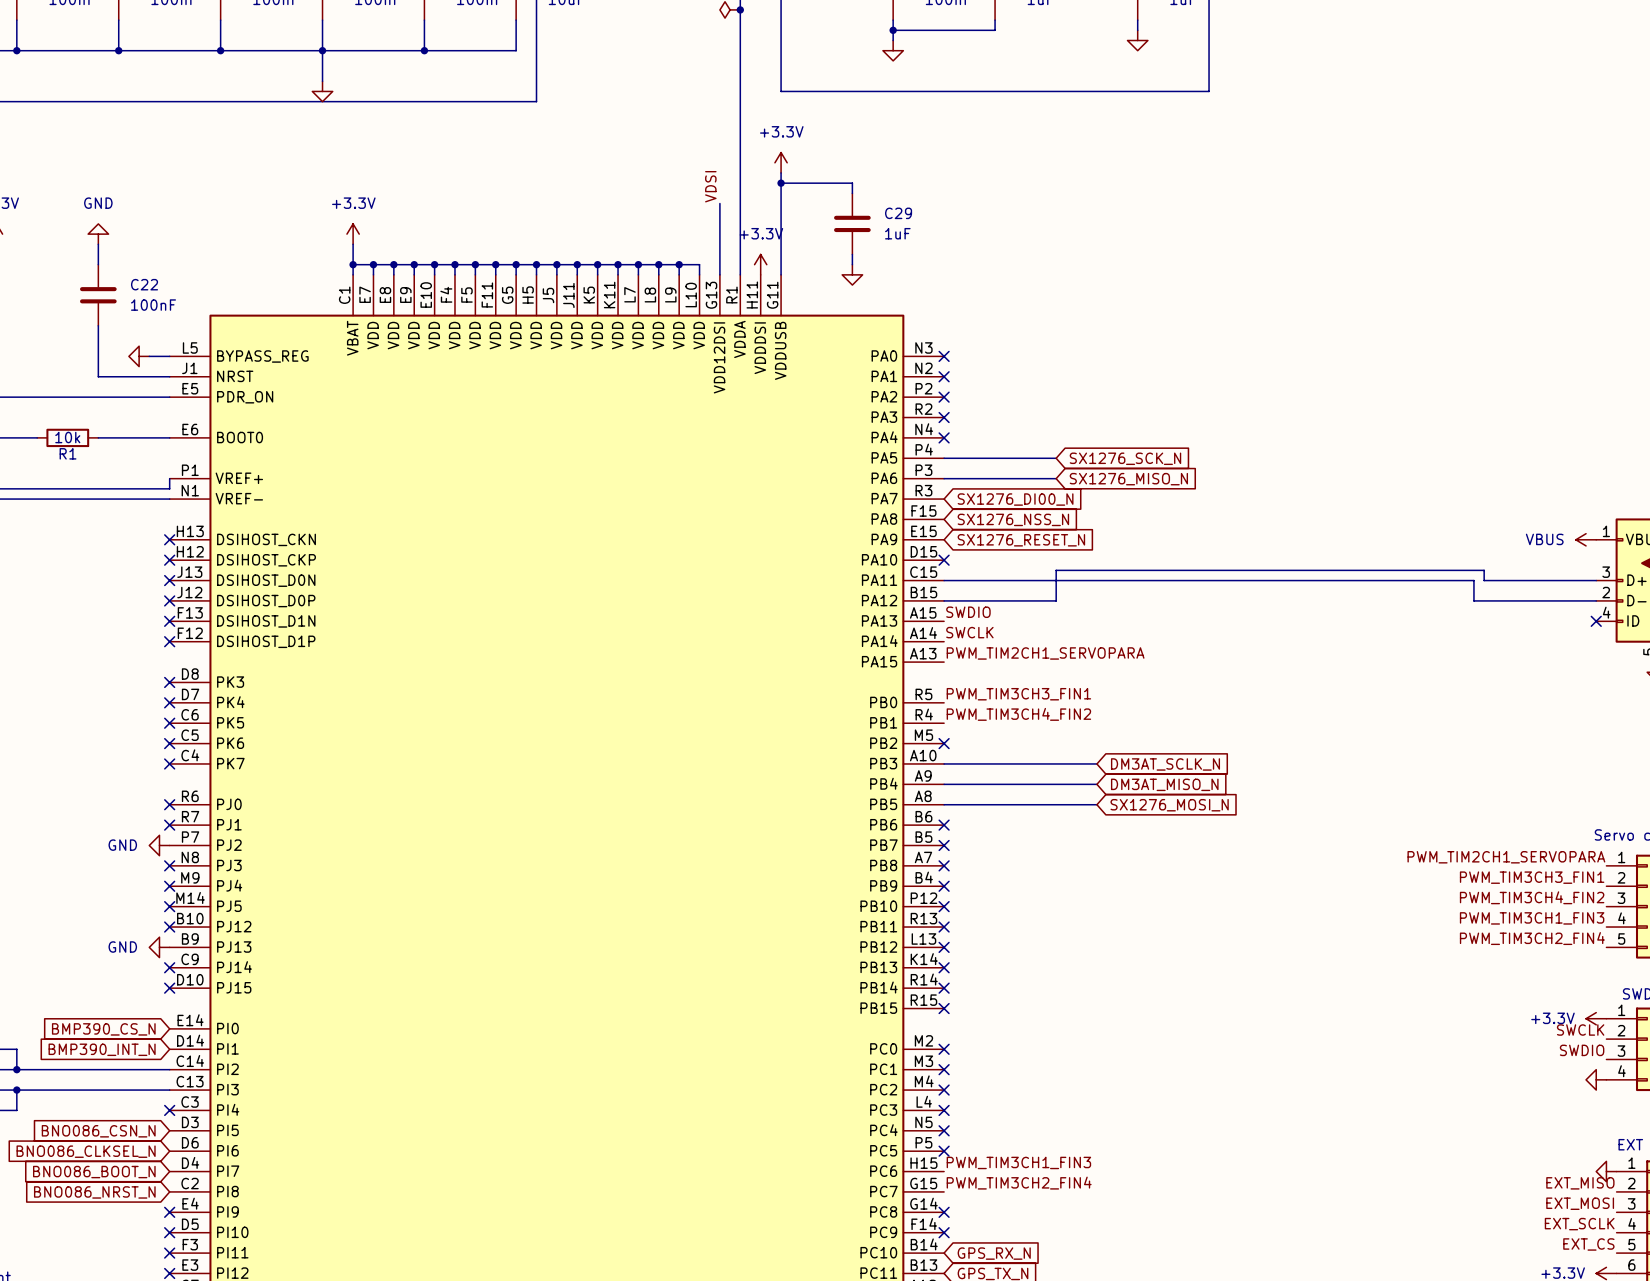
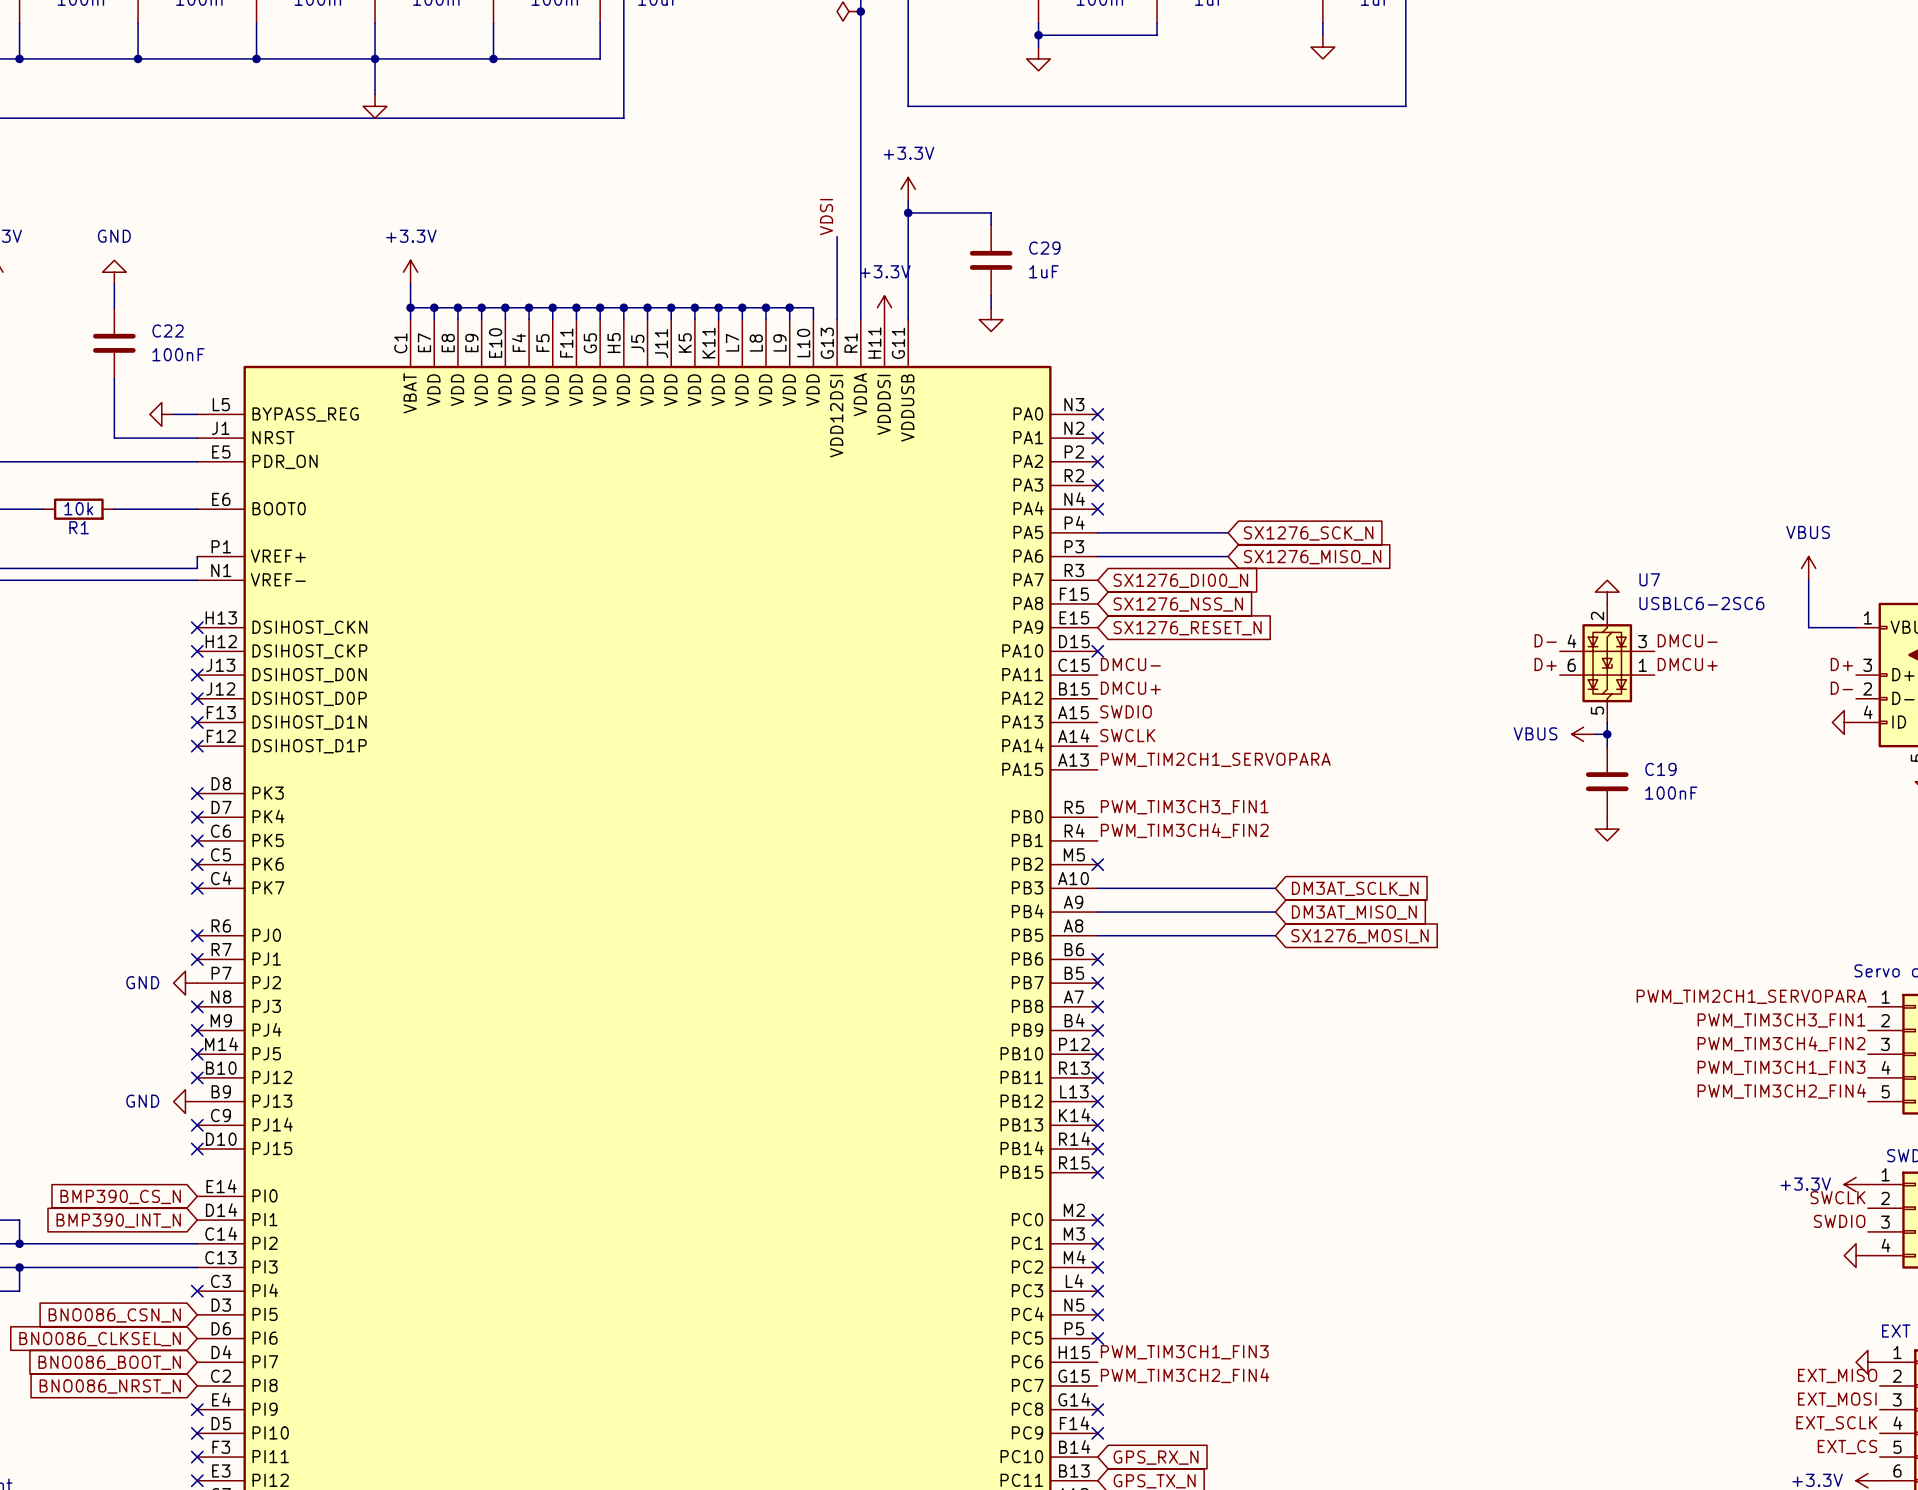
wire: none -> (1808, 580) (1808, 627) (1856, 627)
power symbol: none -> (1607, 592)
power symbol rotation: 0° (1586, 539) -> 90° clockwise (1808, 568)
power symbol position: VBUS (1586, 539) -> VBUS (1808, 568)
label: none -> D- (1545, 640)
label: none -> DMCU- (1687, 640)
U7: none -> USBLC6-2SC6 (1607, 663)
label: none -> DMCU- (1130, 664)
label: none -> D+ (1545, 664)
label: none -> DMCU+ (1687, 664)
label: none -> D+ (1841, 664)
wire: (944, 580) (1473, 580) (1473, 600) (1596, 600) -> none
wire: (1596, 580) (1484, 580) (1484, 570) (1056, 570) (1056, 600) (944, 600) -> none
label: none -> DMCU+ (1130, 688)
label: none -> D- (1841, 688)
wire: none -> (1607, 722) (1607, 746)
power symbol: none -> (1844, 722)
no-connect mark: (1596, 621) -> none
power symbol: none -> VBUS (1583, 734)
wire: none -> (1595, 734) (1607, 734)
junction: none -> (1607, 734)
C19: none -> 100nF (1607, 781)
power symbol: none -> (1607, 829)

